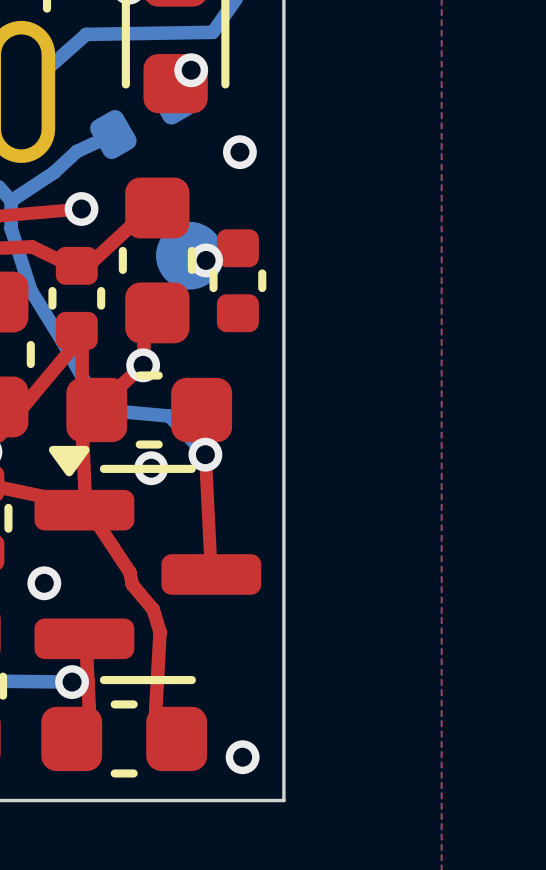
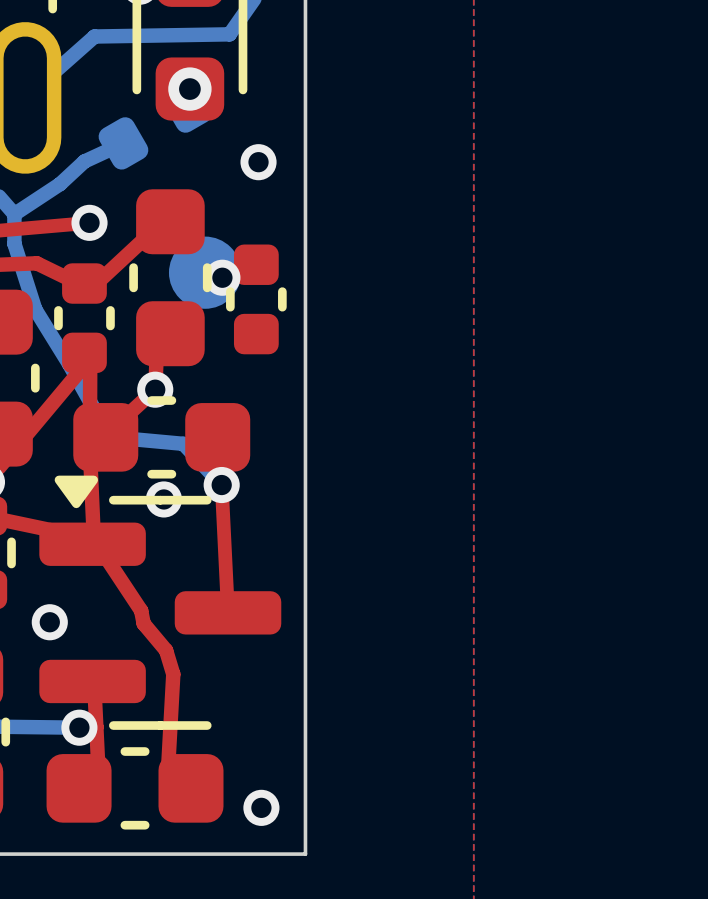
via position: (191, 70) -> (189, 89)

